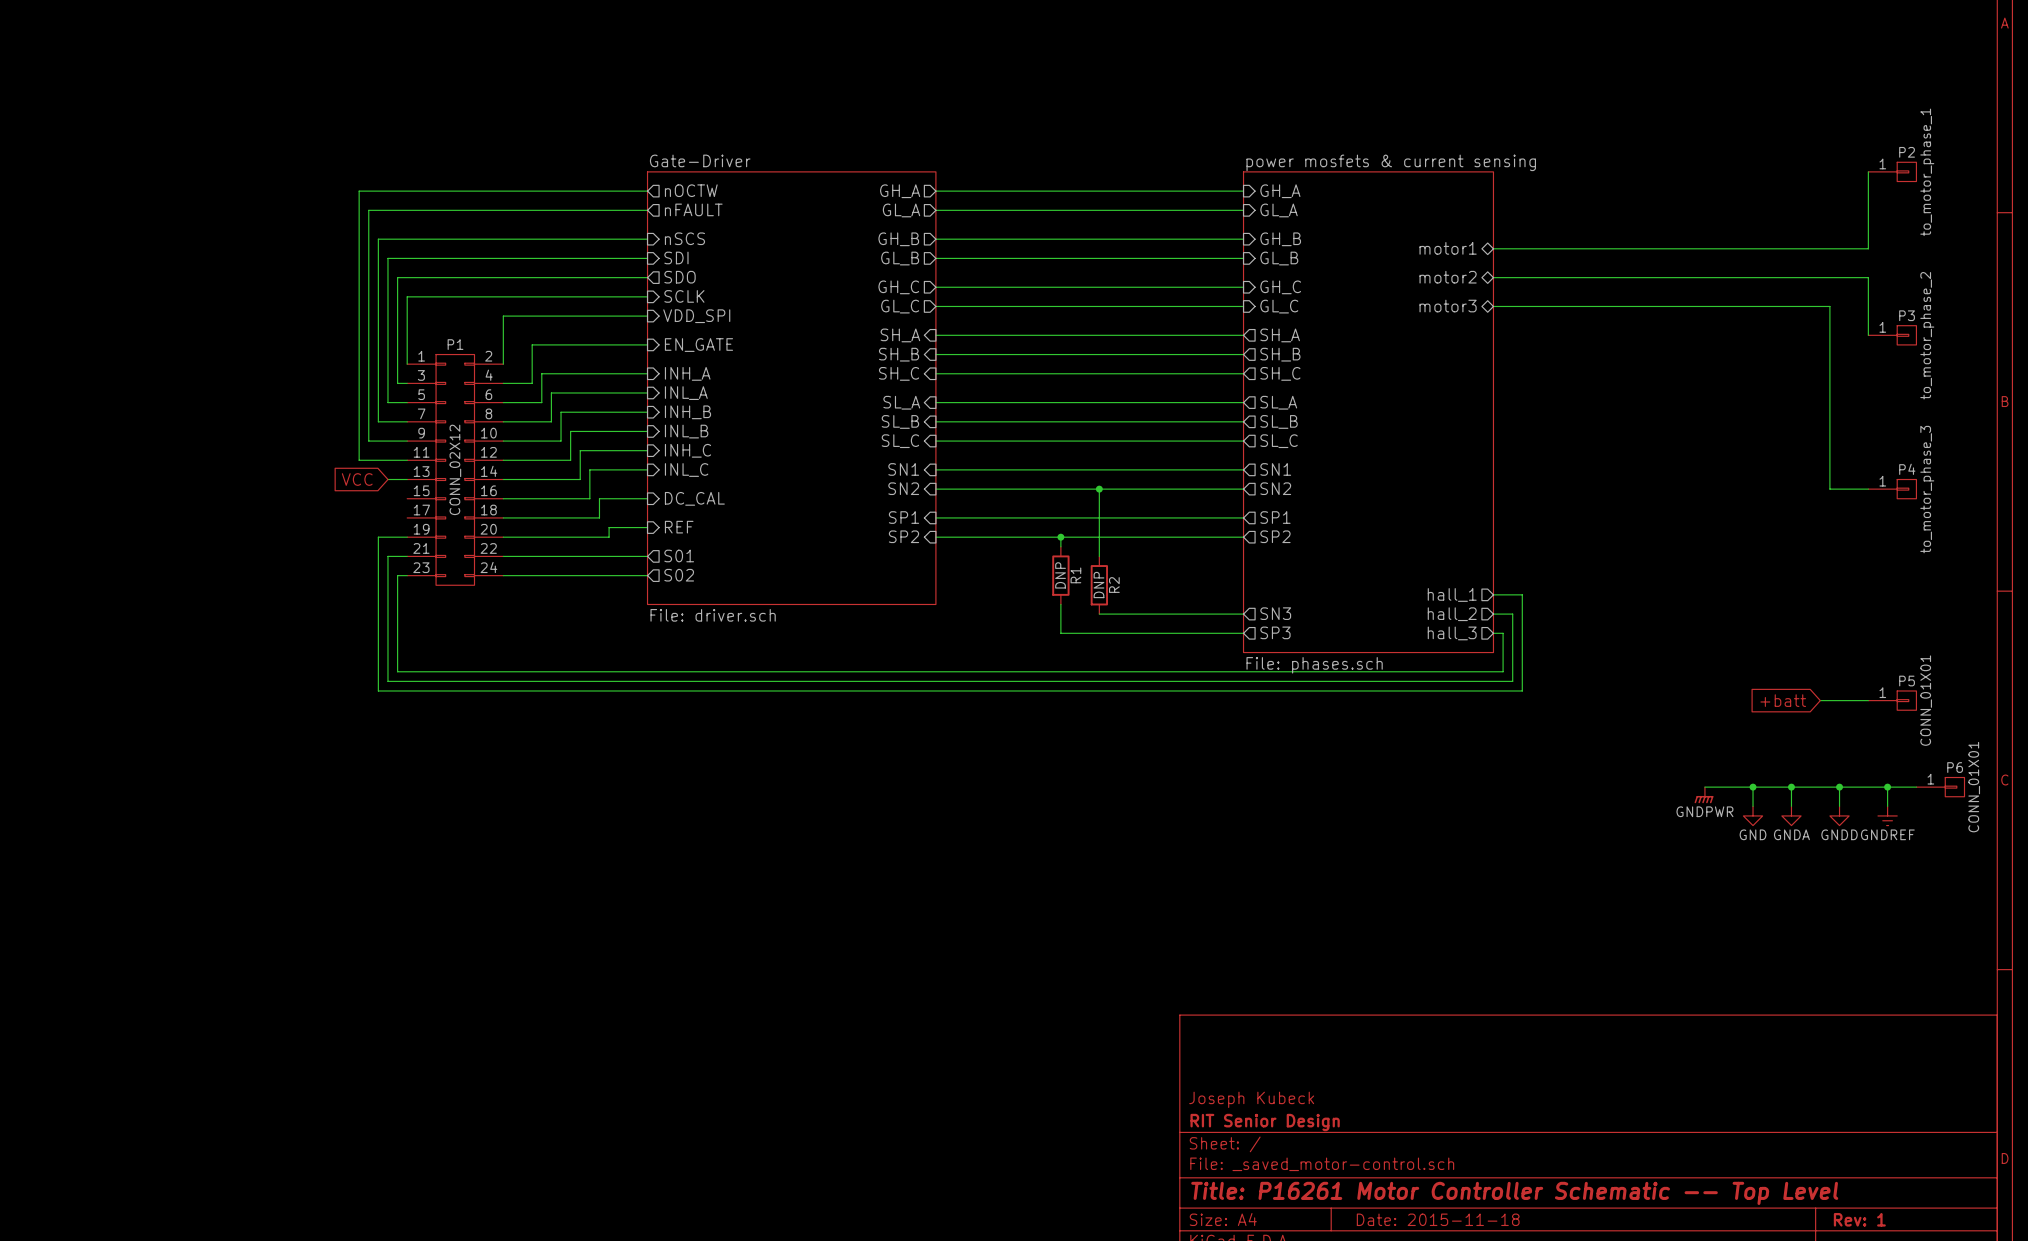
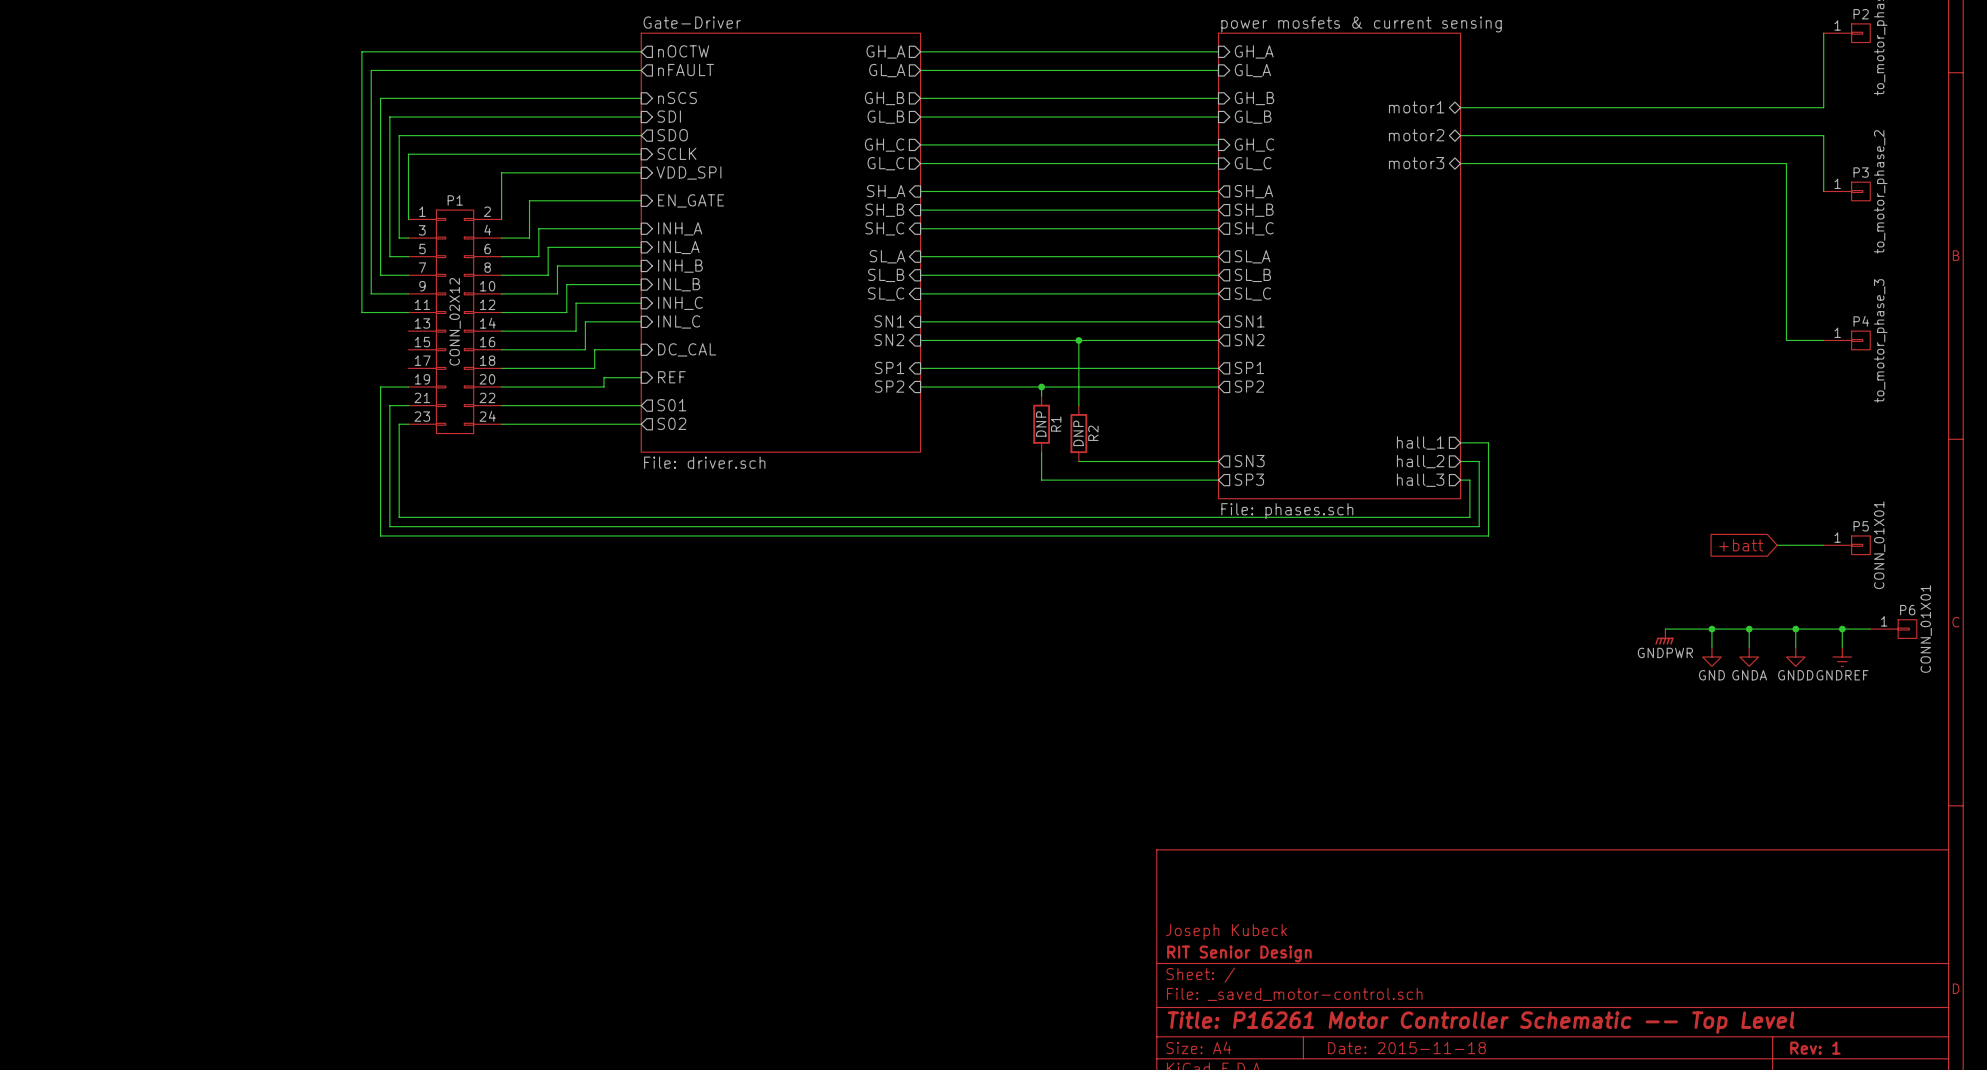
global label: VCC (357, 479) -> none
wire: (387, 479) (407, 479) -> none

